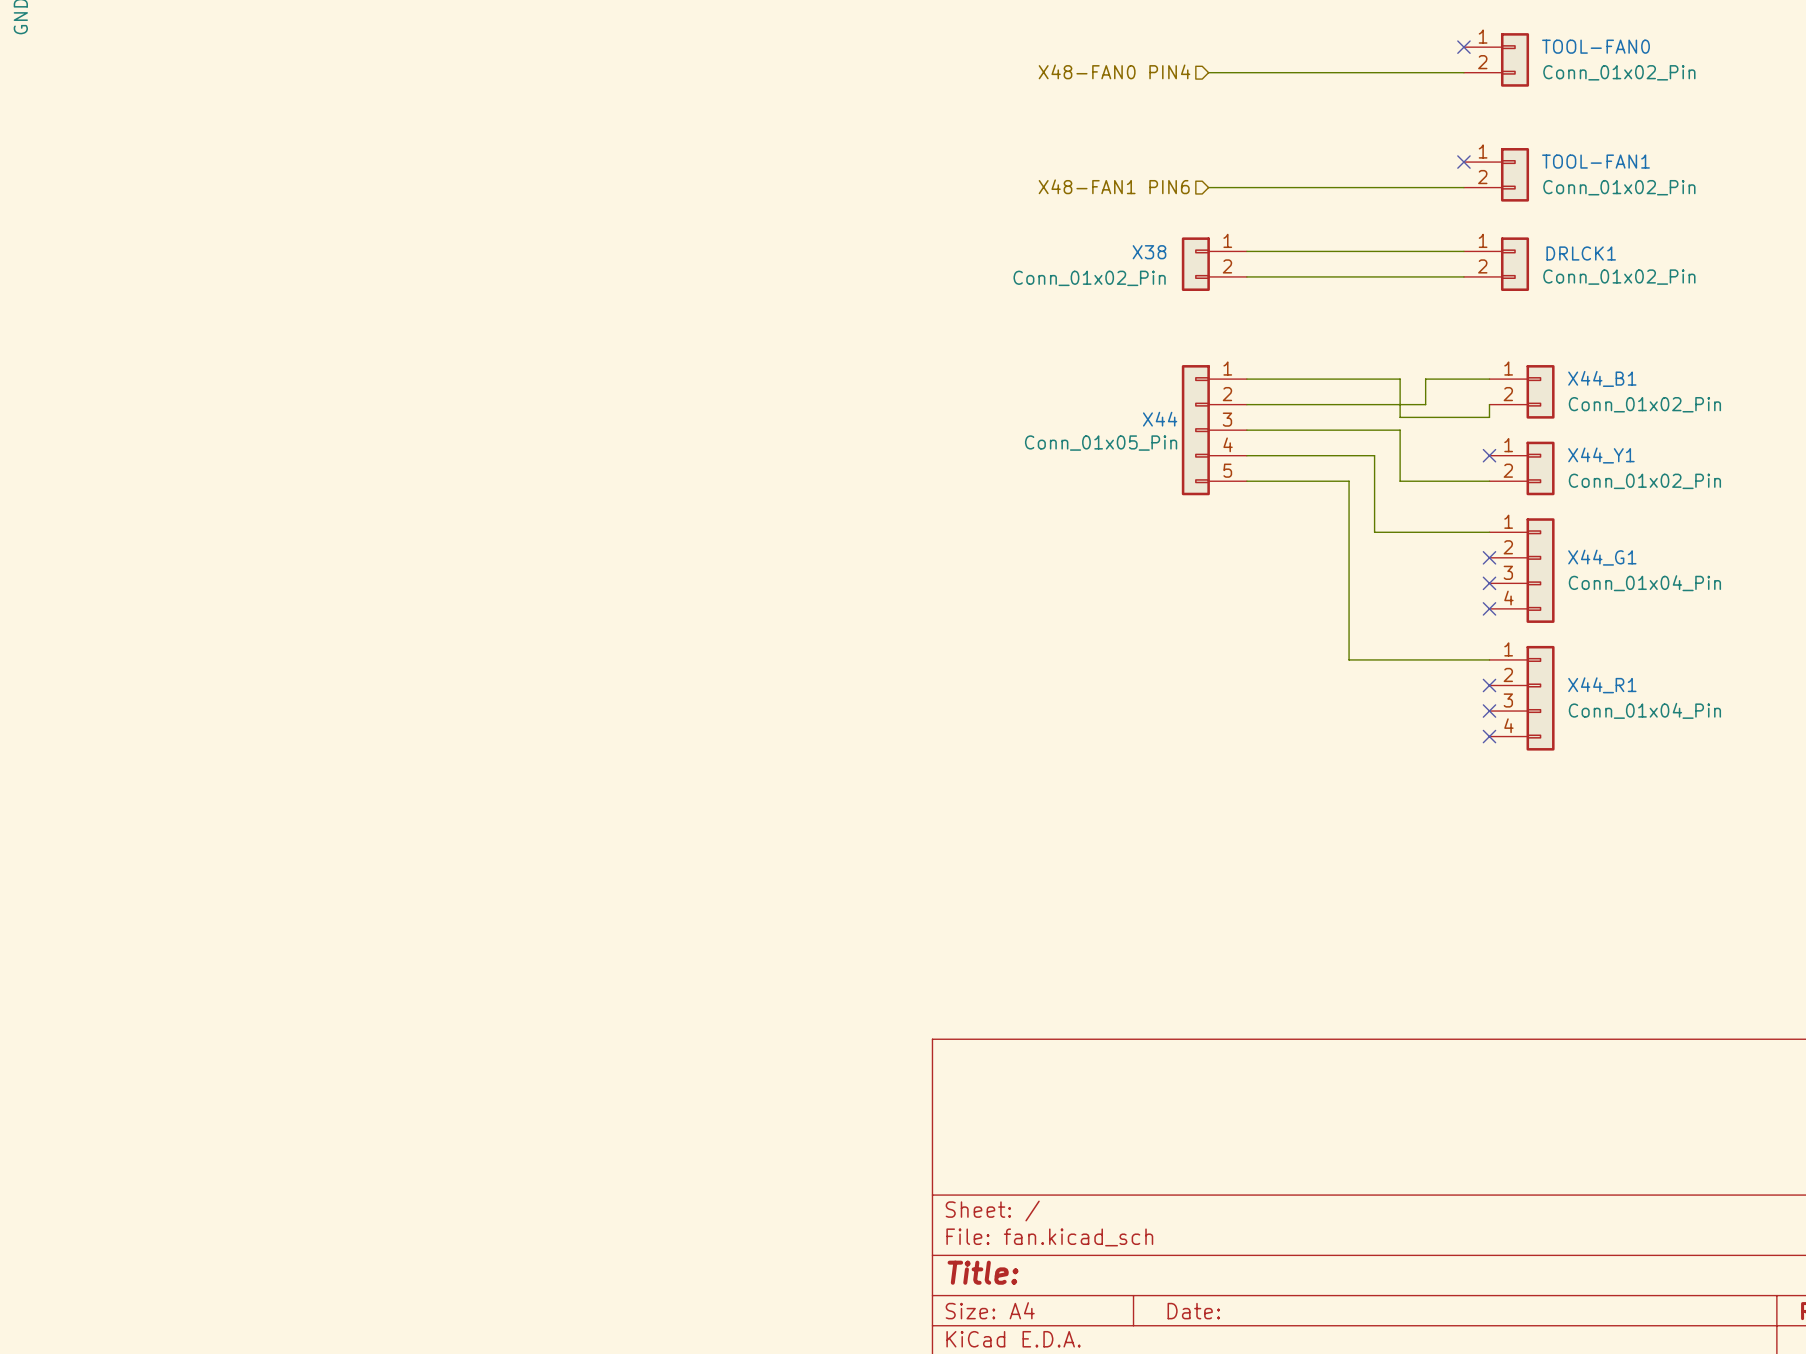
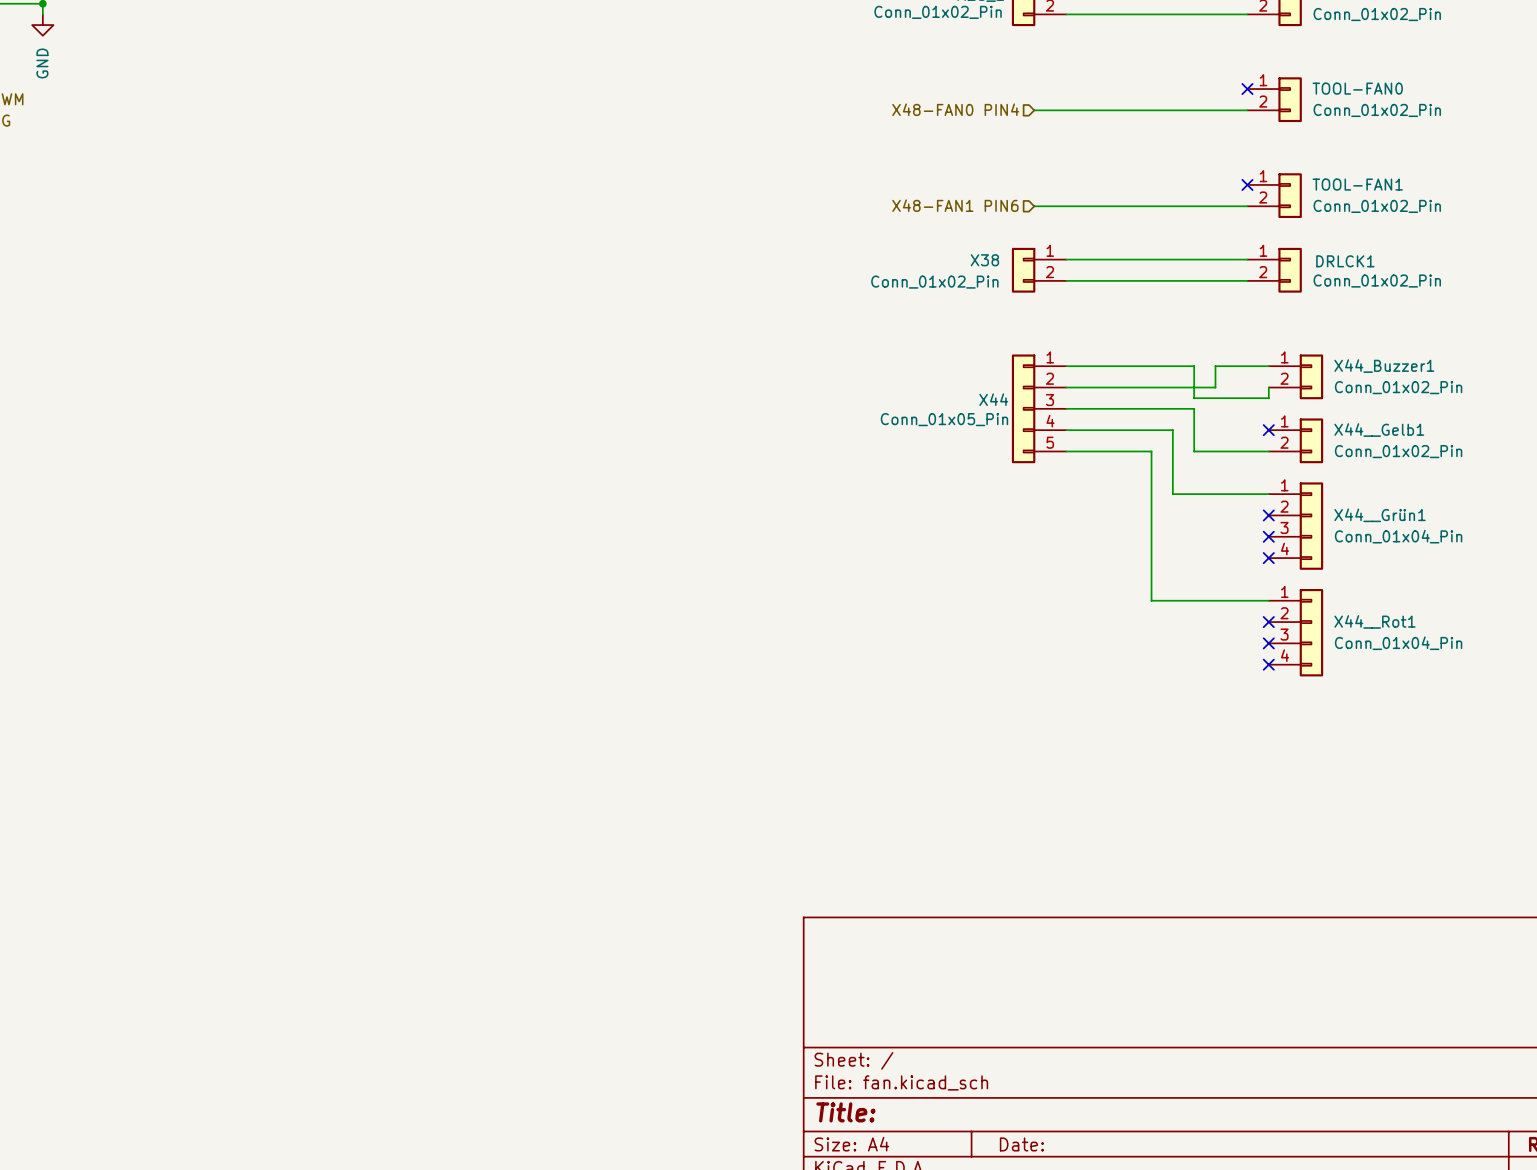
X44_B1 name: X44_B1 (1602, 378) -> X44_Buzzer1 (1384, 366)
X44_Y1 name: X44_Y1 (1601, 455) -> X44__Gelb1 (1379, 430)
X44_G1 name: X44_G1 (1602, 557) -> X44__Grün1 (1380, 515)
X44_R1 name: X44_R1 (1602, 685) -> X44__Rot1 (1374, 621)

